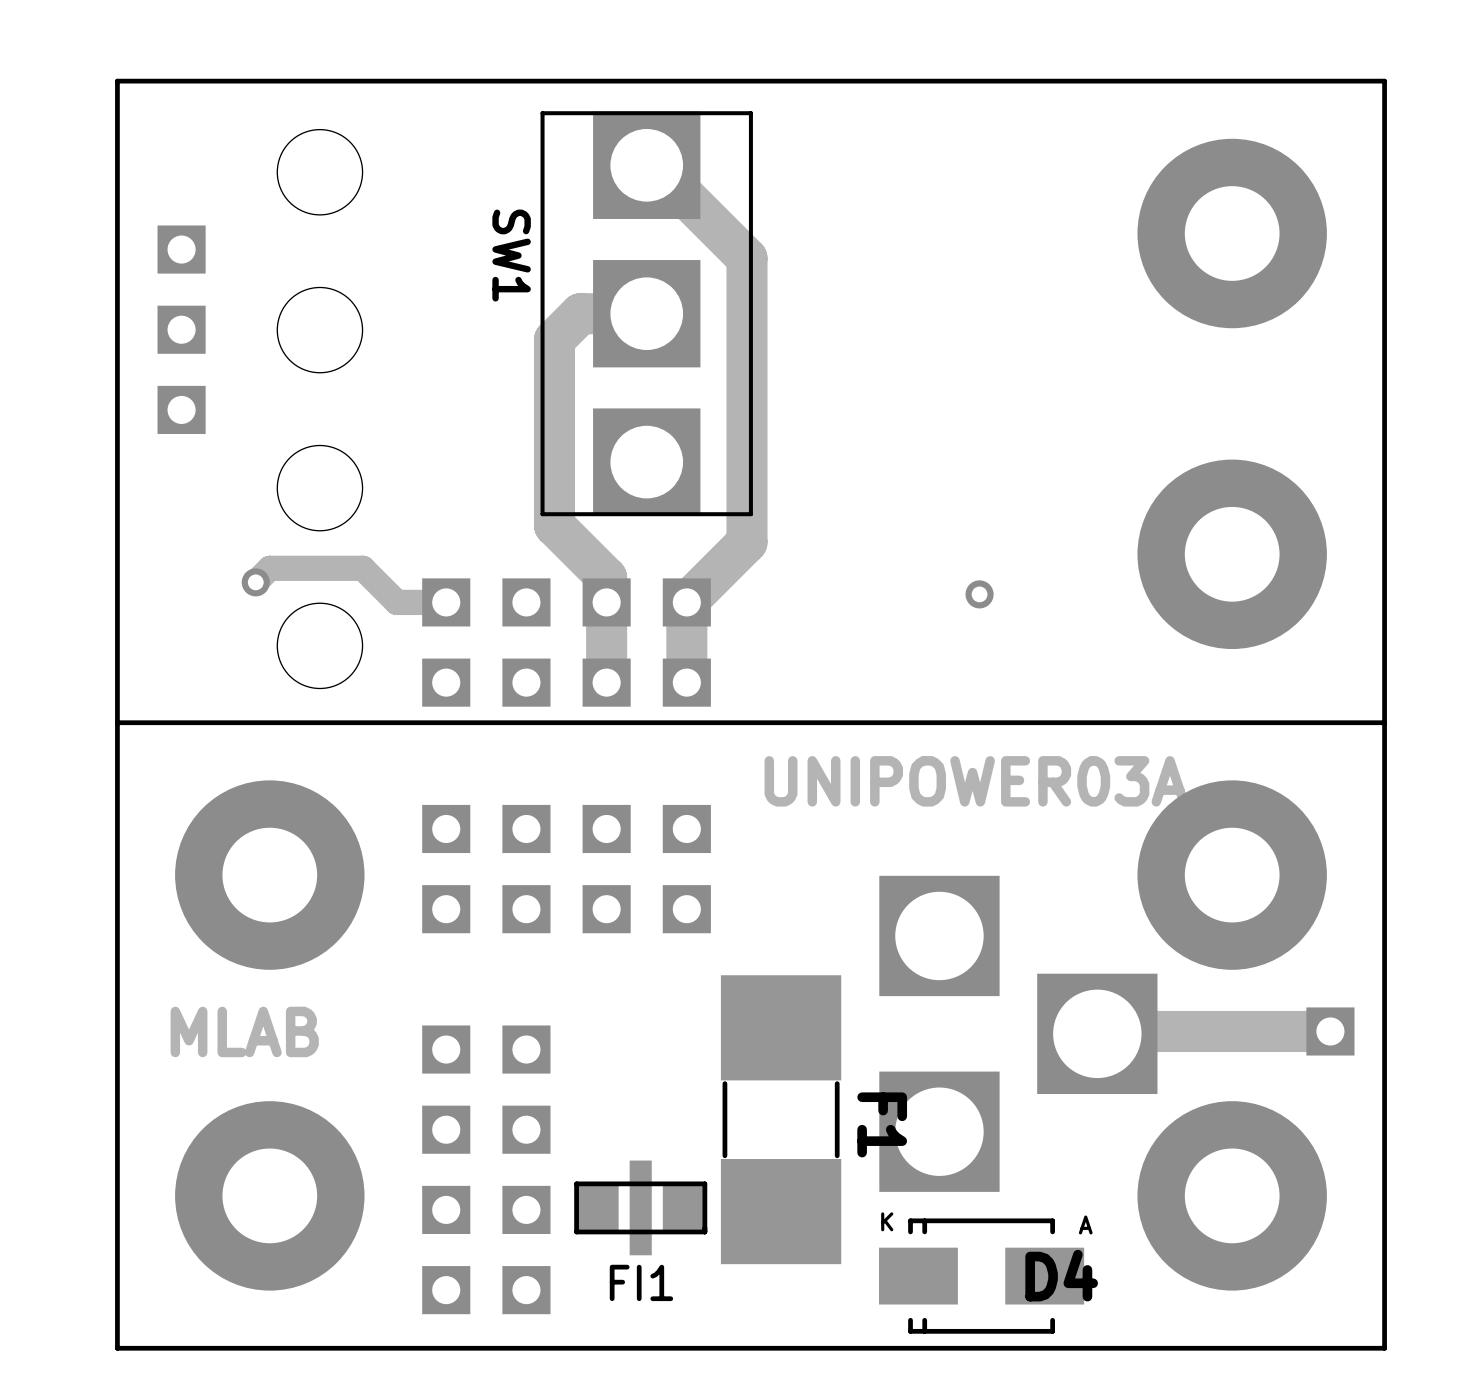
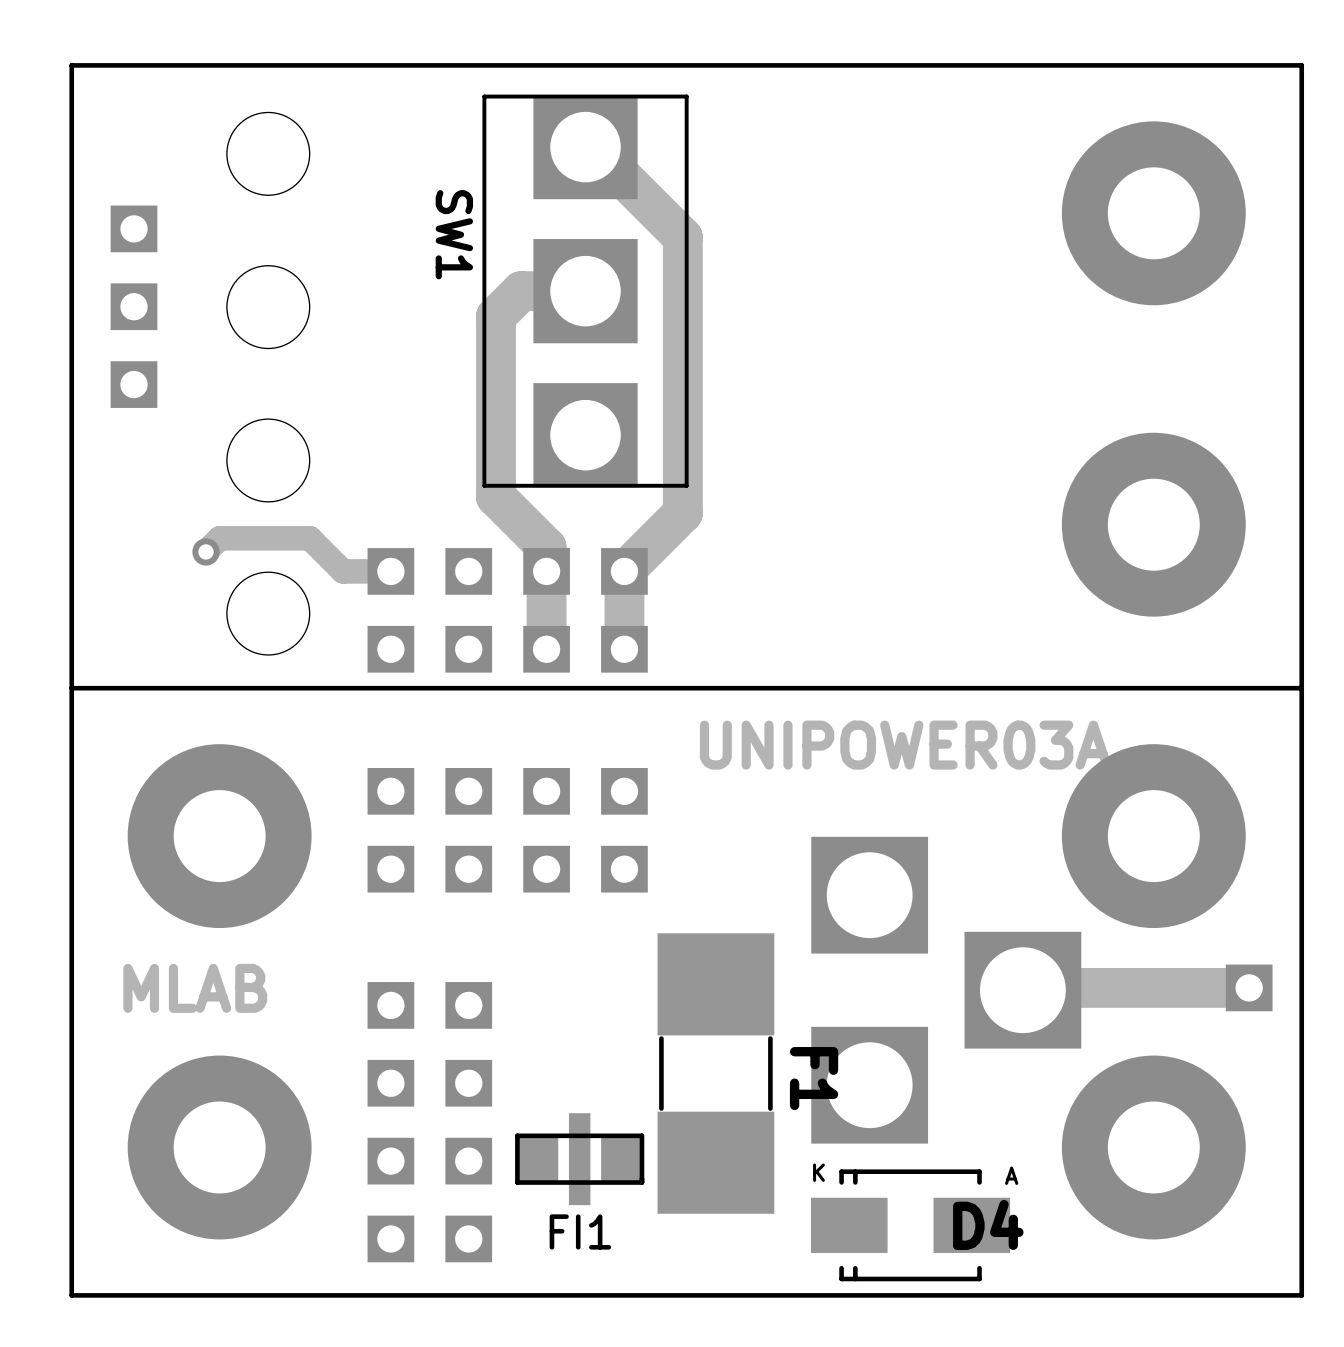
via: (979, 594) -> none

